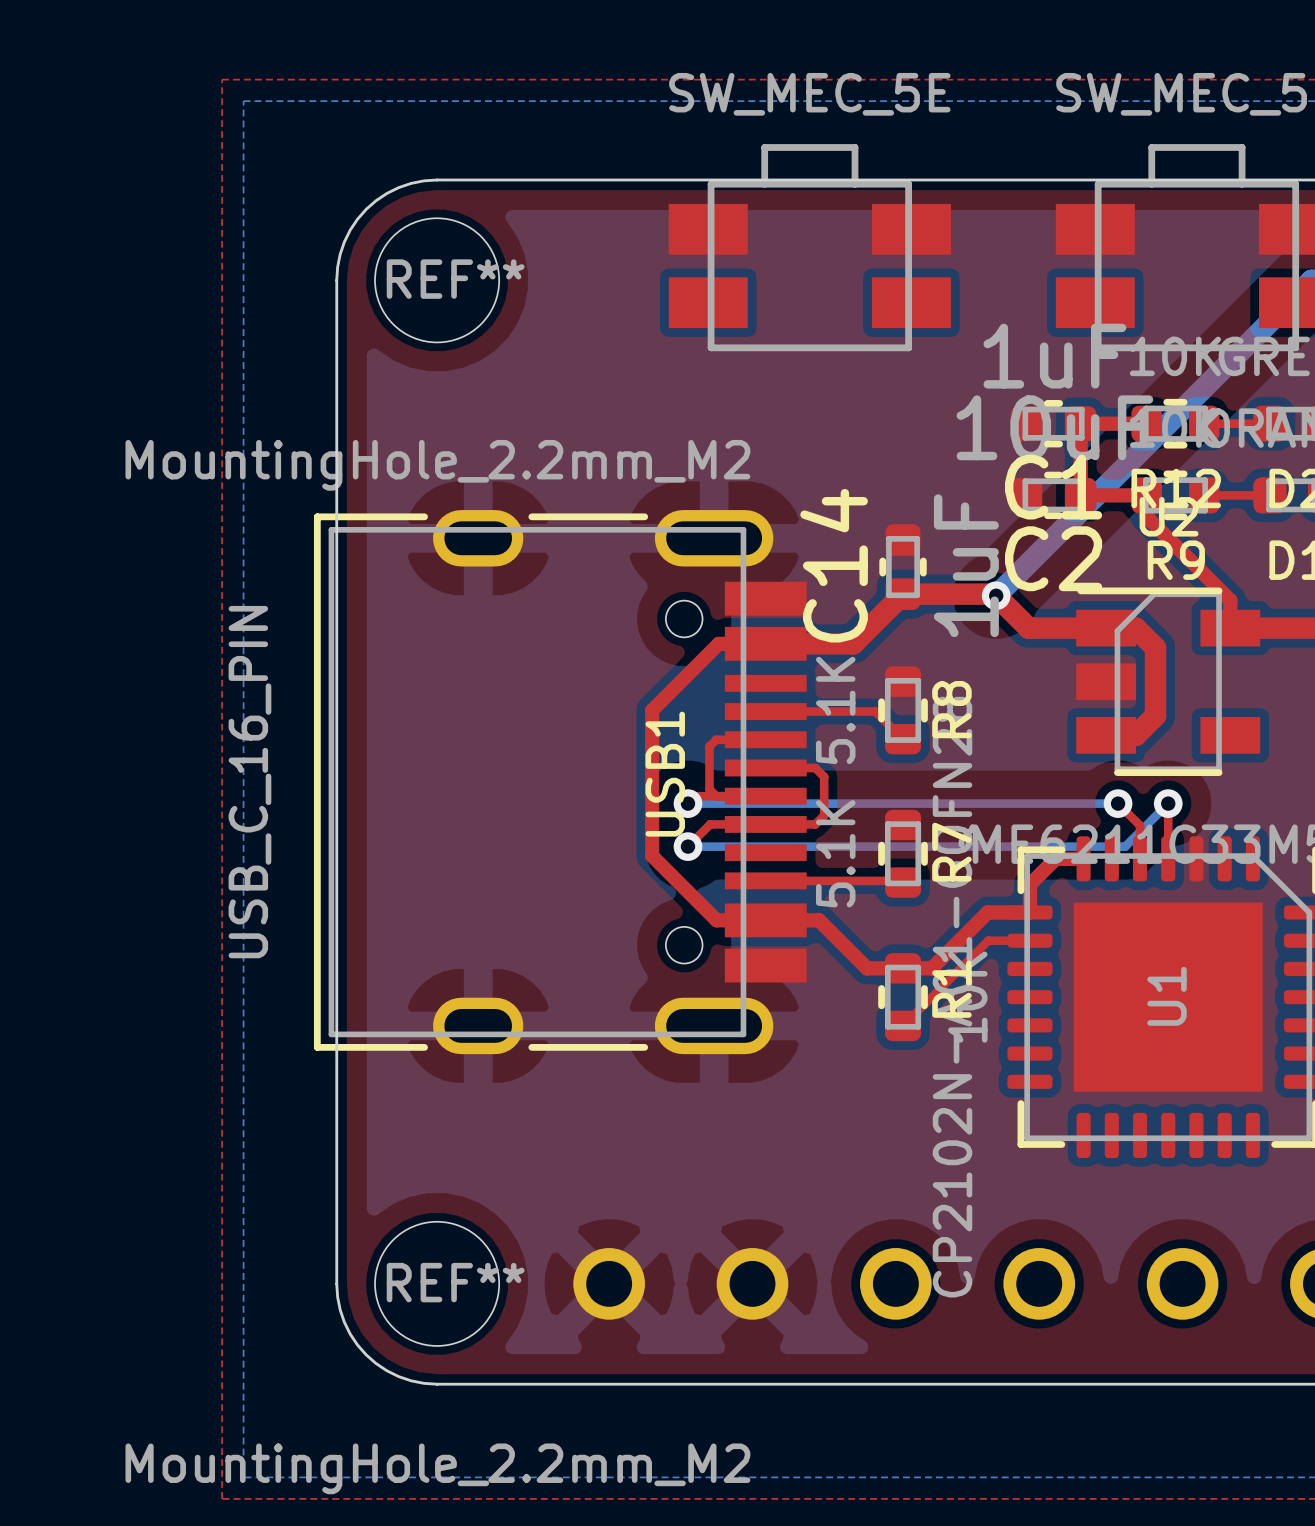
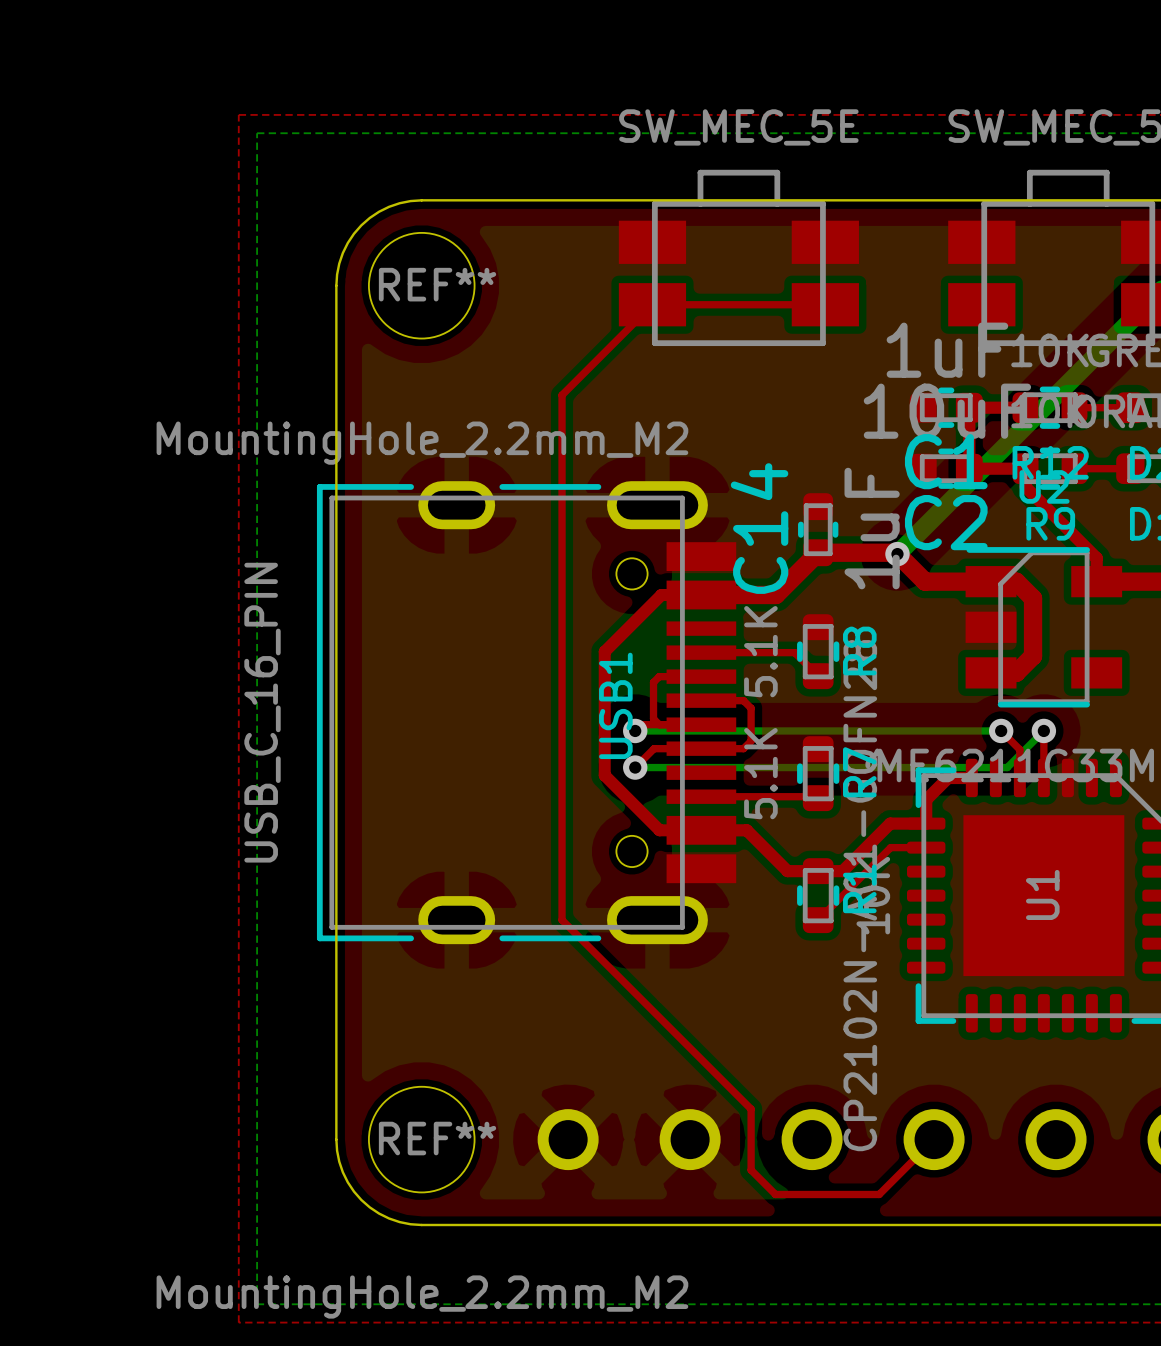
top track: none -> (825, 304) (652, 304) (562, 395) (562, 920) (751, 1109) (751, 1170) (775, 1194) (879, 1194) (934, 1139)

